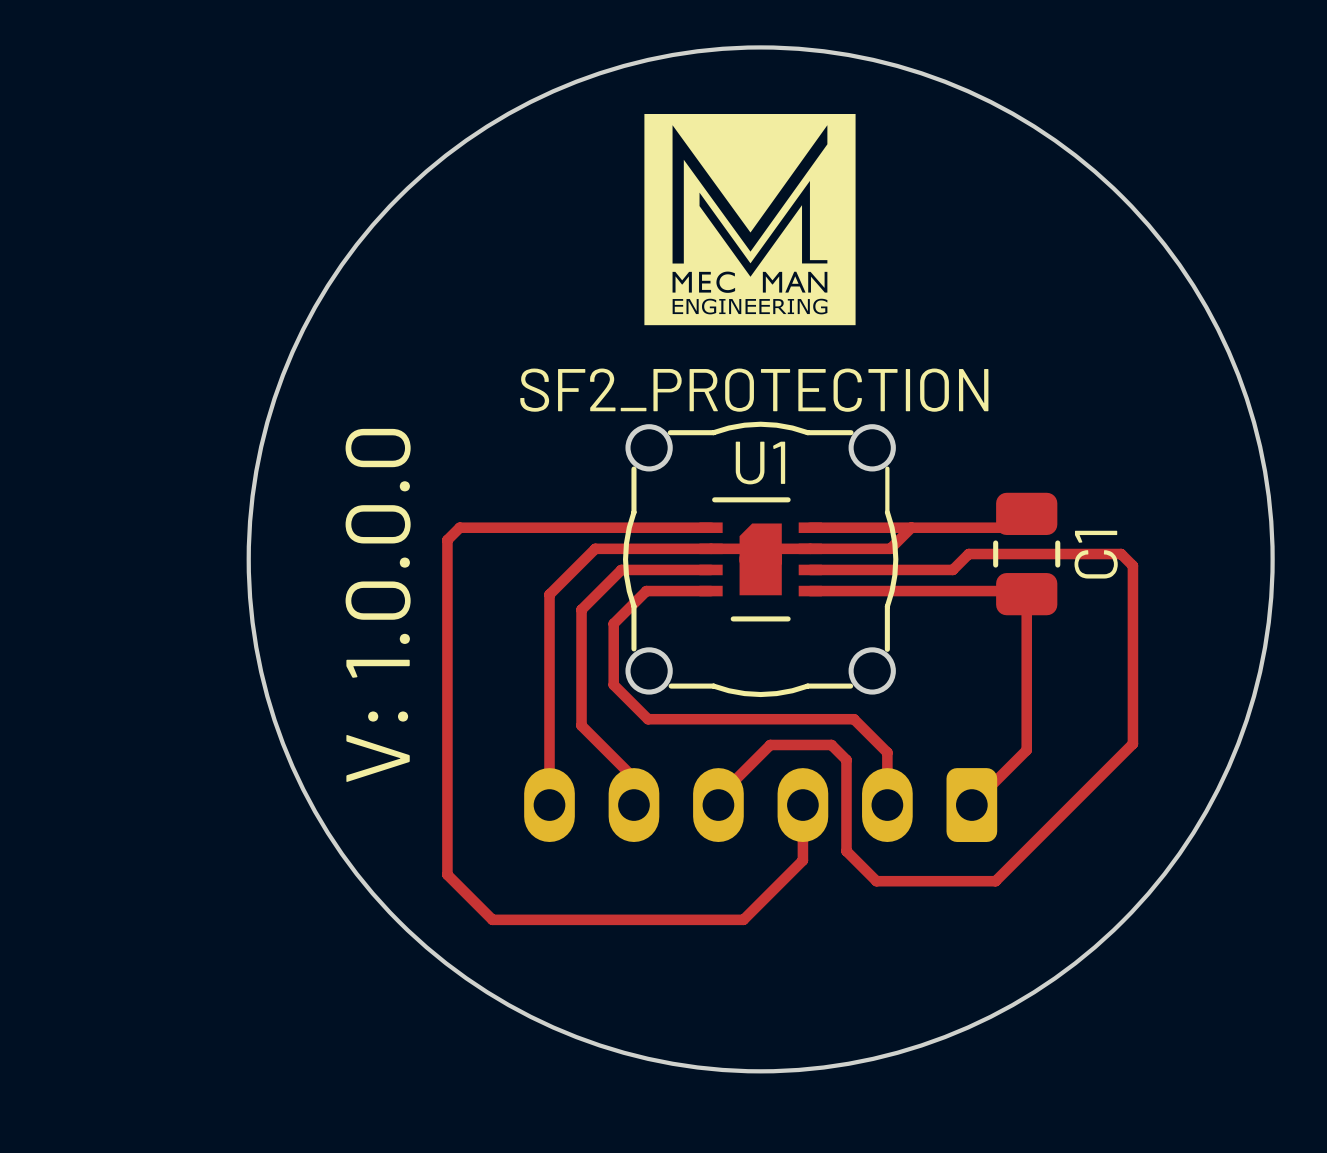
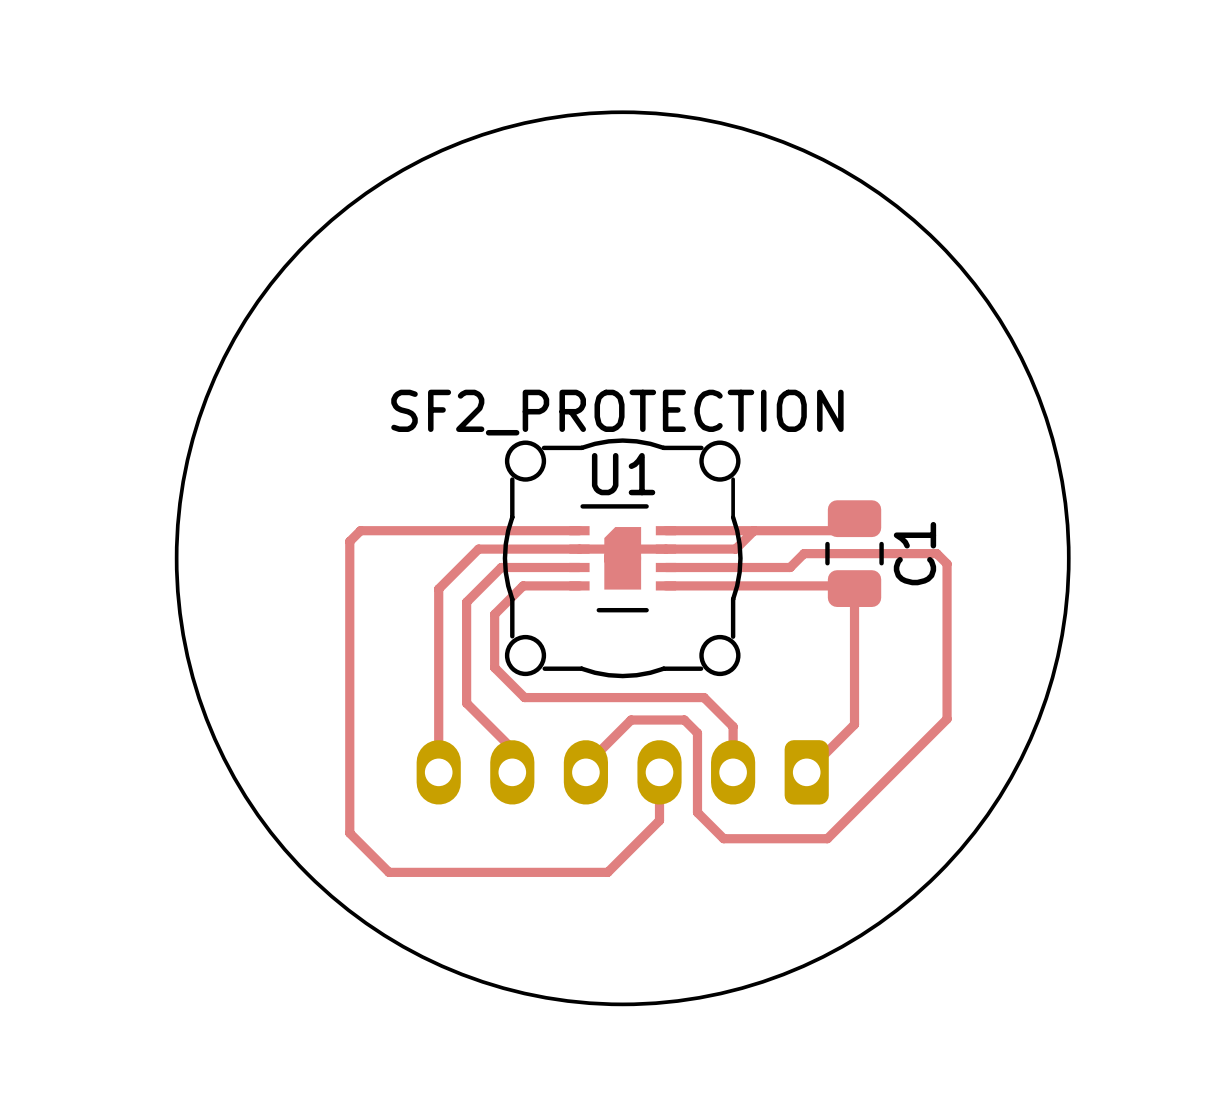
drawing: [644, 113, 856, 326] -> none
text: V: 1.0.0.0 (378, 605) -> none

